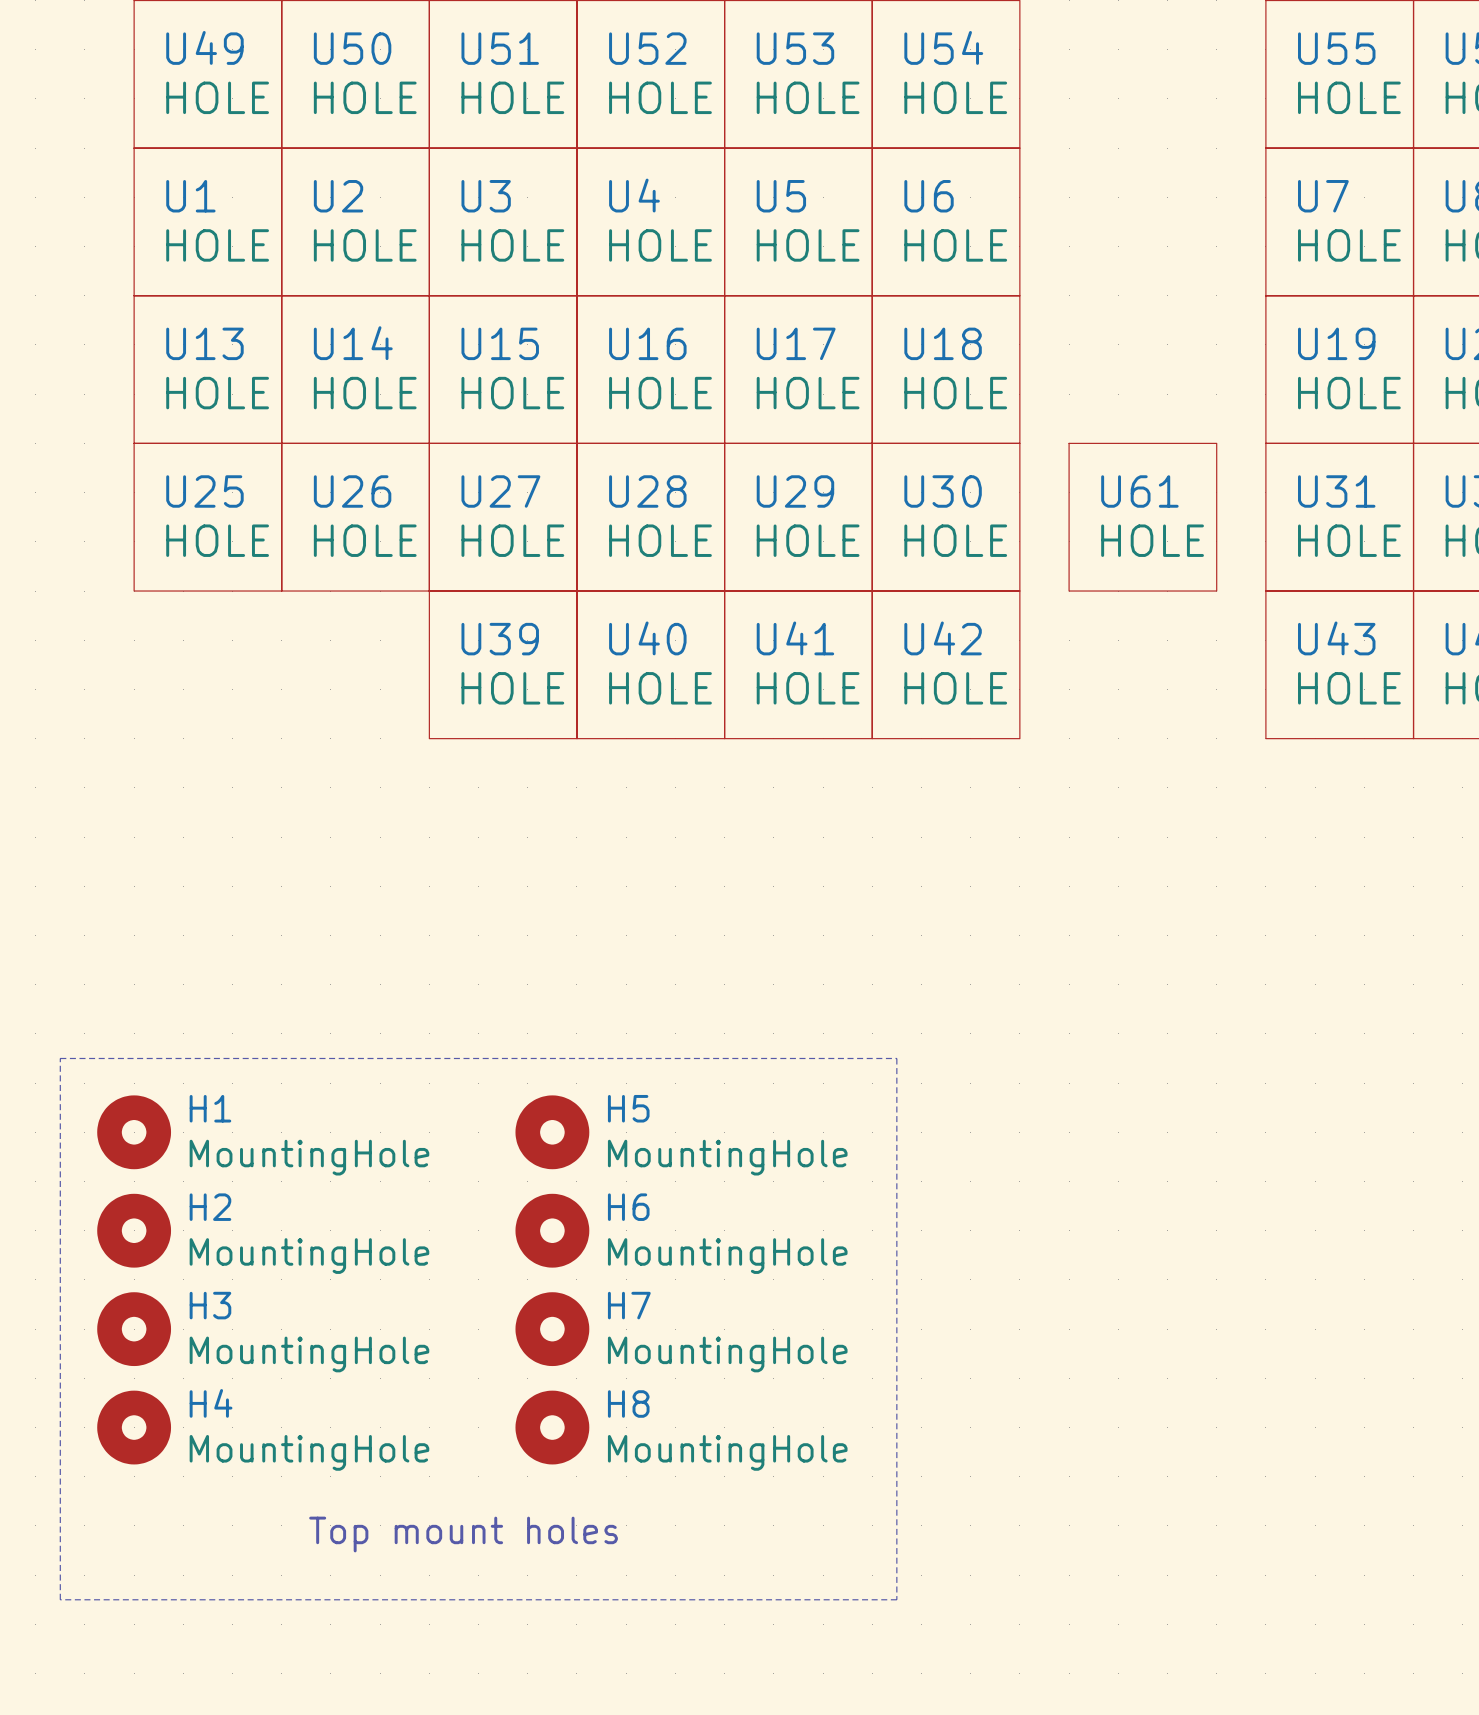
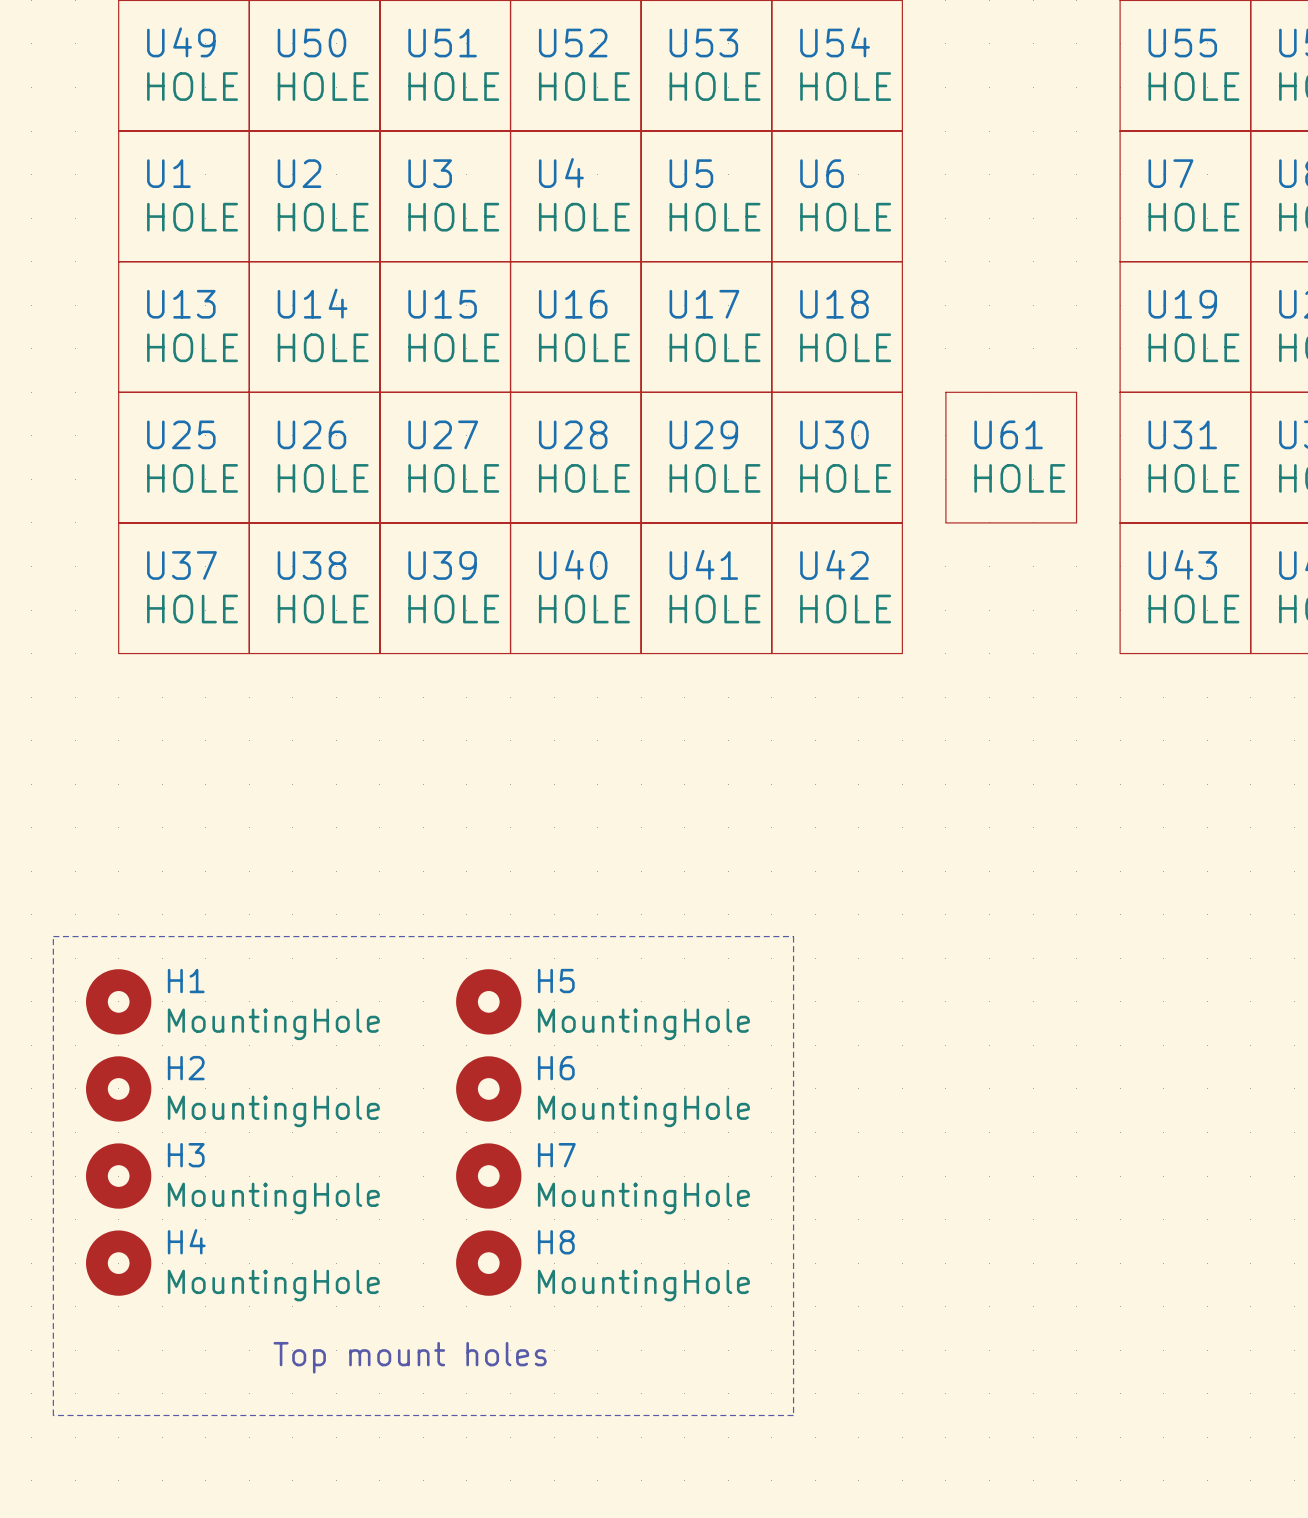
U37: none -> HOLE (183, 588)
U38: none -> HOLE (314, 588)

